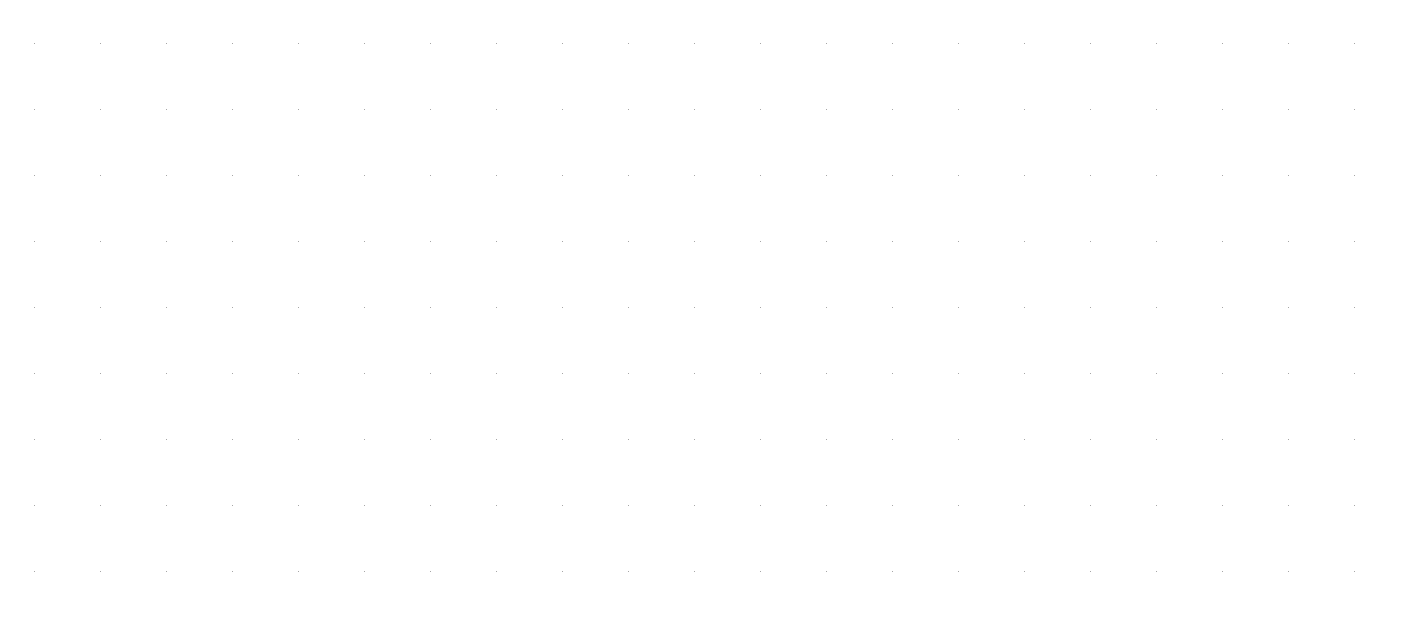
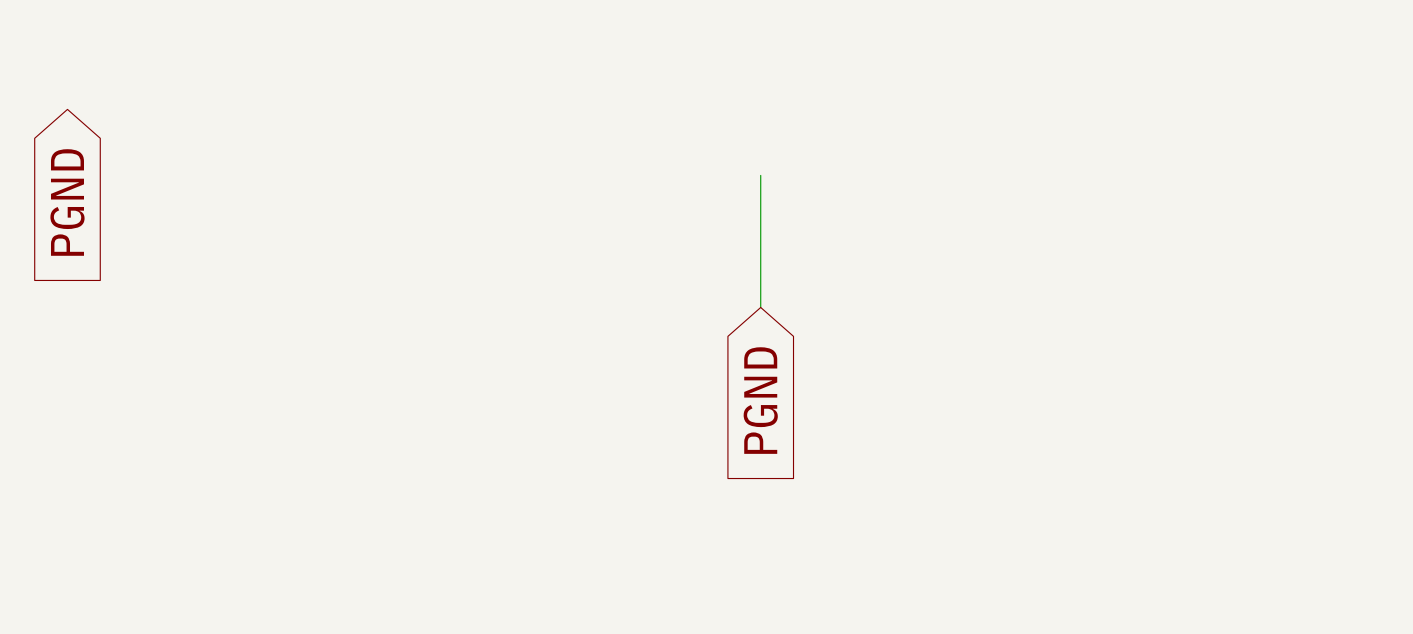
wire: none -> (760, 175) (760, 307)
global label: none -> PGND (67, 202)
global label: none -> PGND (760, 400)

